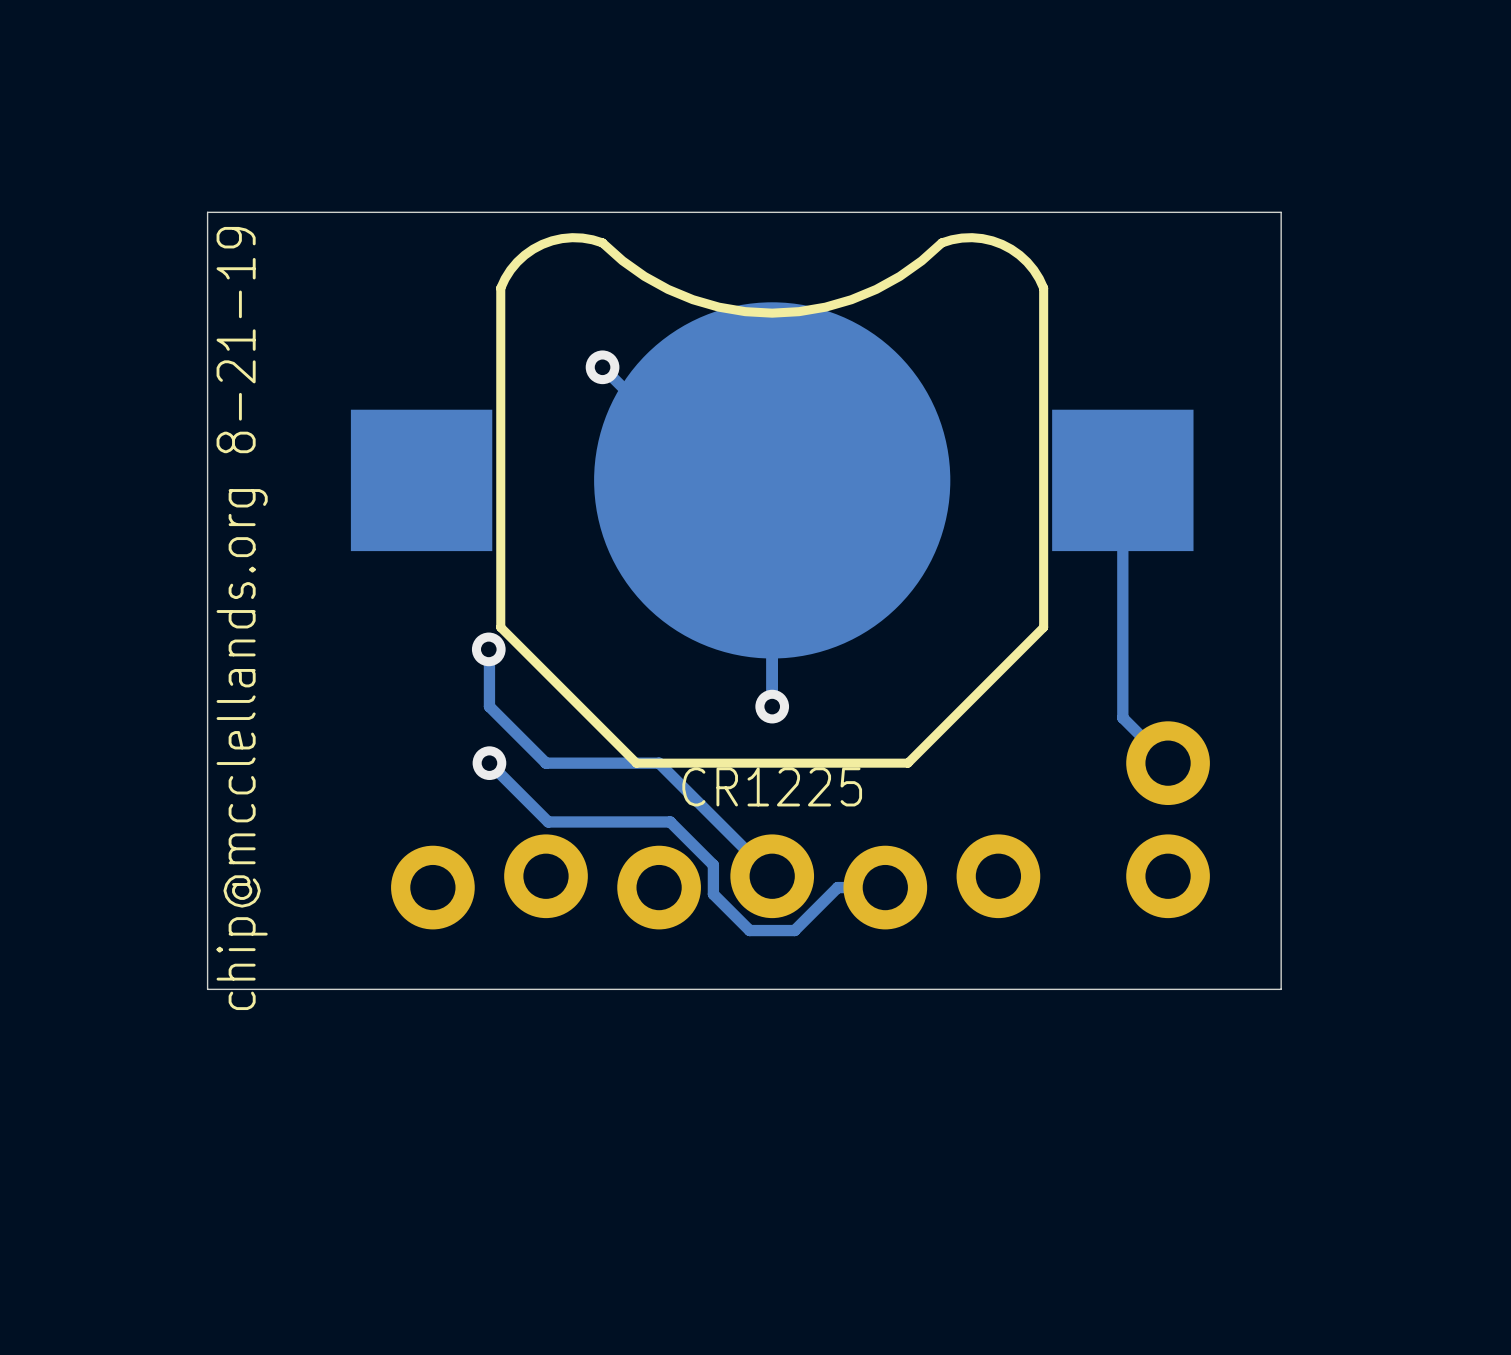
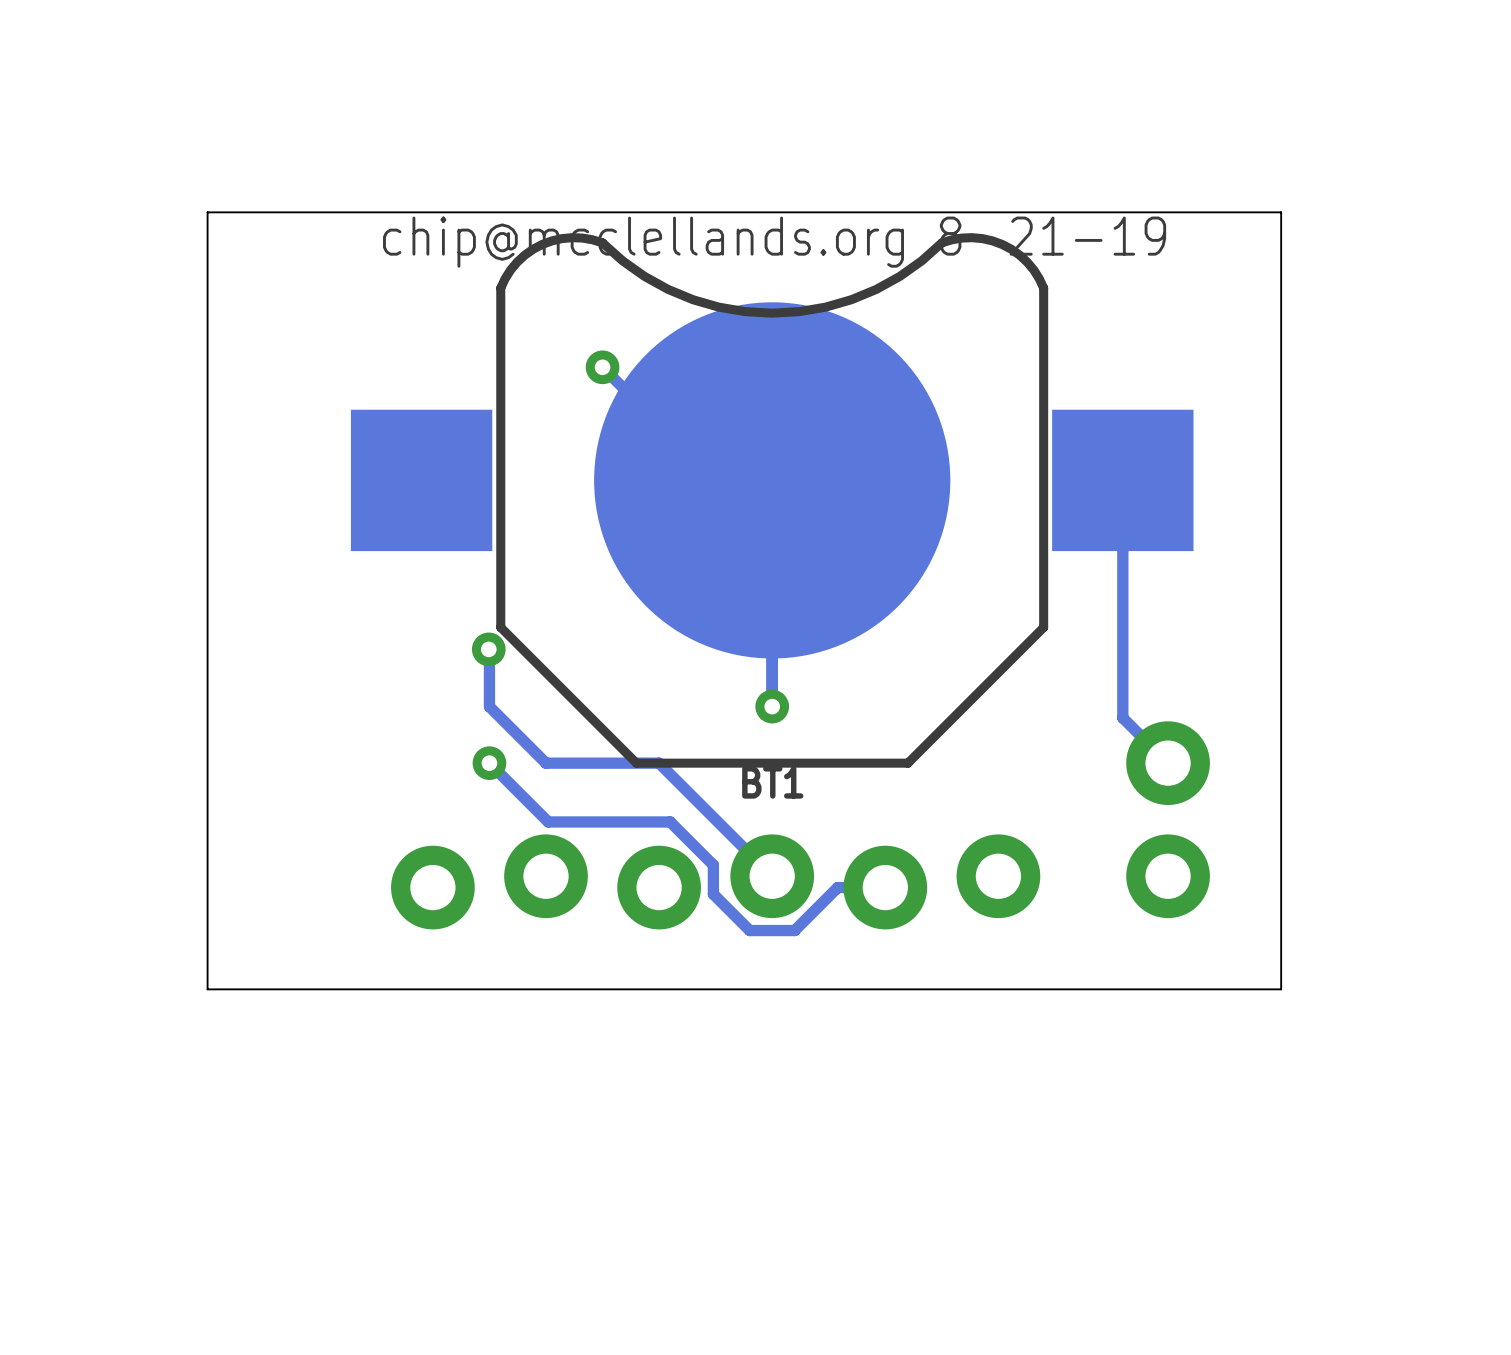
text rotation: 0° (242, 618) -> 90° clockwise (774, 242)
CR1225 name: CR1225 (772, 786) -> BT1 (772, 782)

